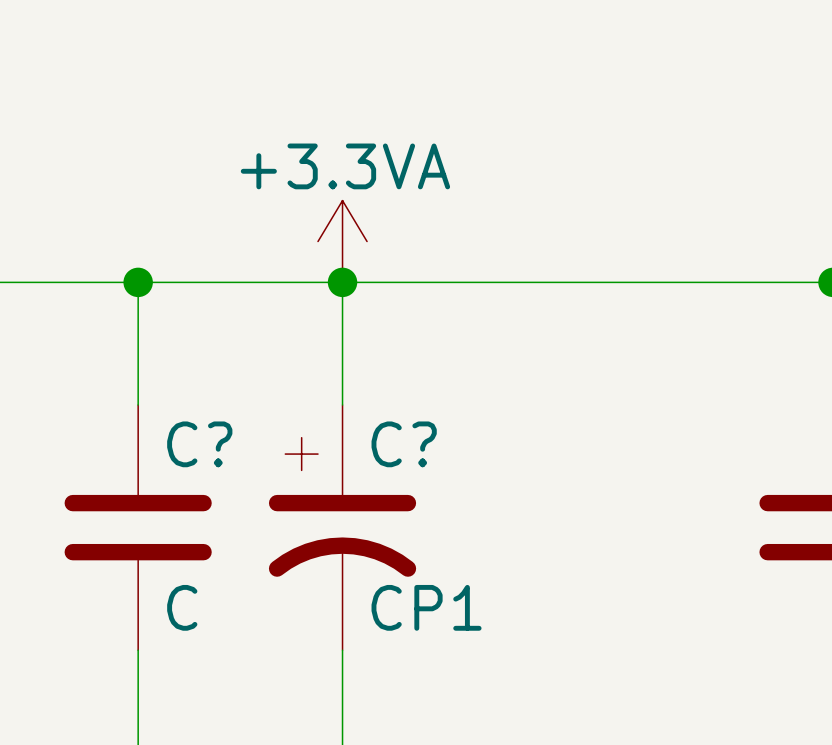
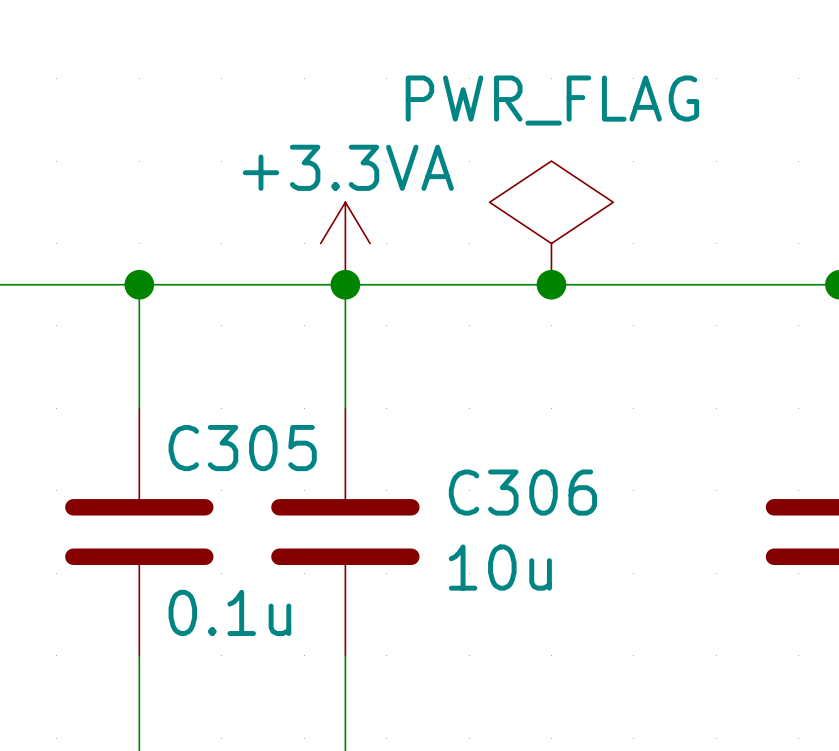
power symbol: none -> PWR_FLAG (551, 222)
junction: none -> (551, 284)
C? name: C? (199, 444) -> C305 (242, 448)
C?: CP1 (342, 527) -> none
C306: none -> 10u (345, 532)
C? value: C (182, 607) -> 0.1u (229, 612)

